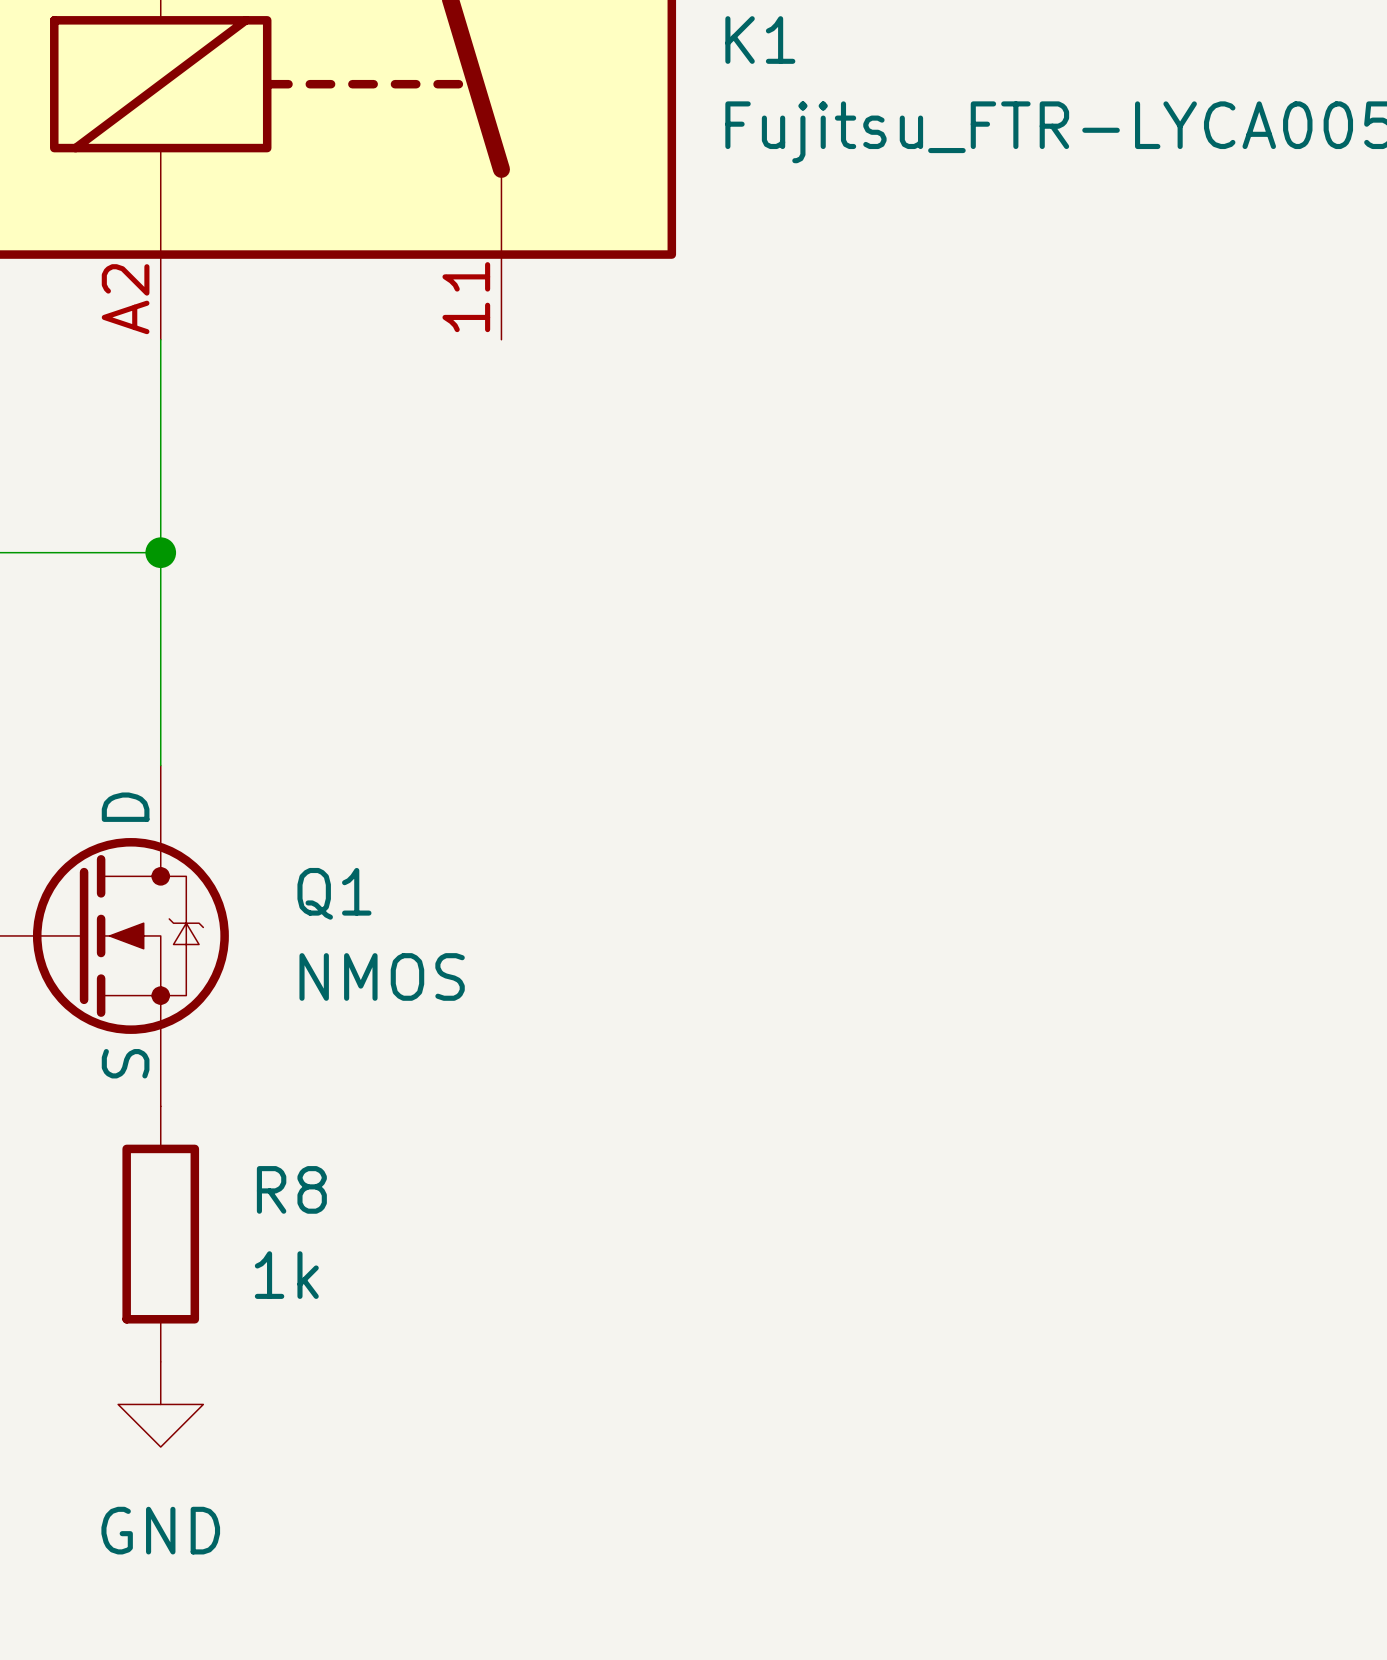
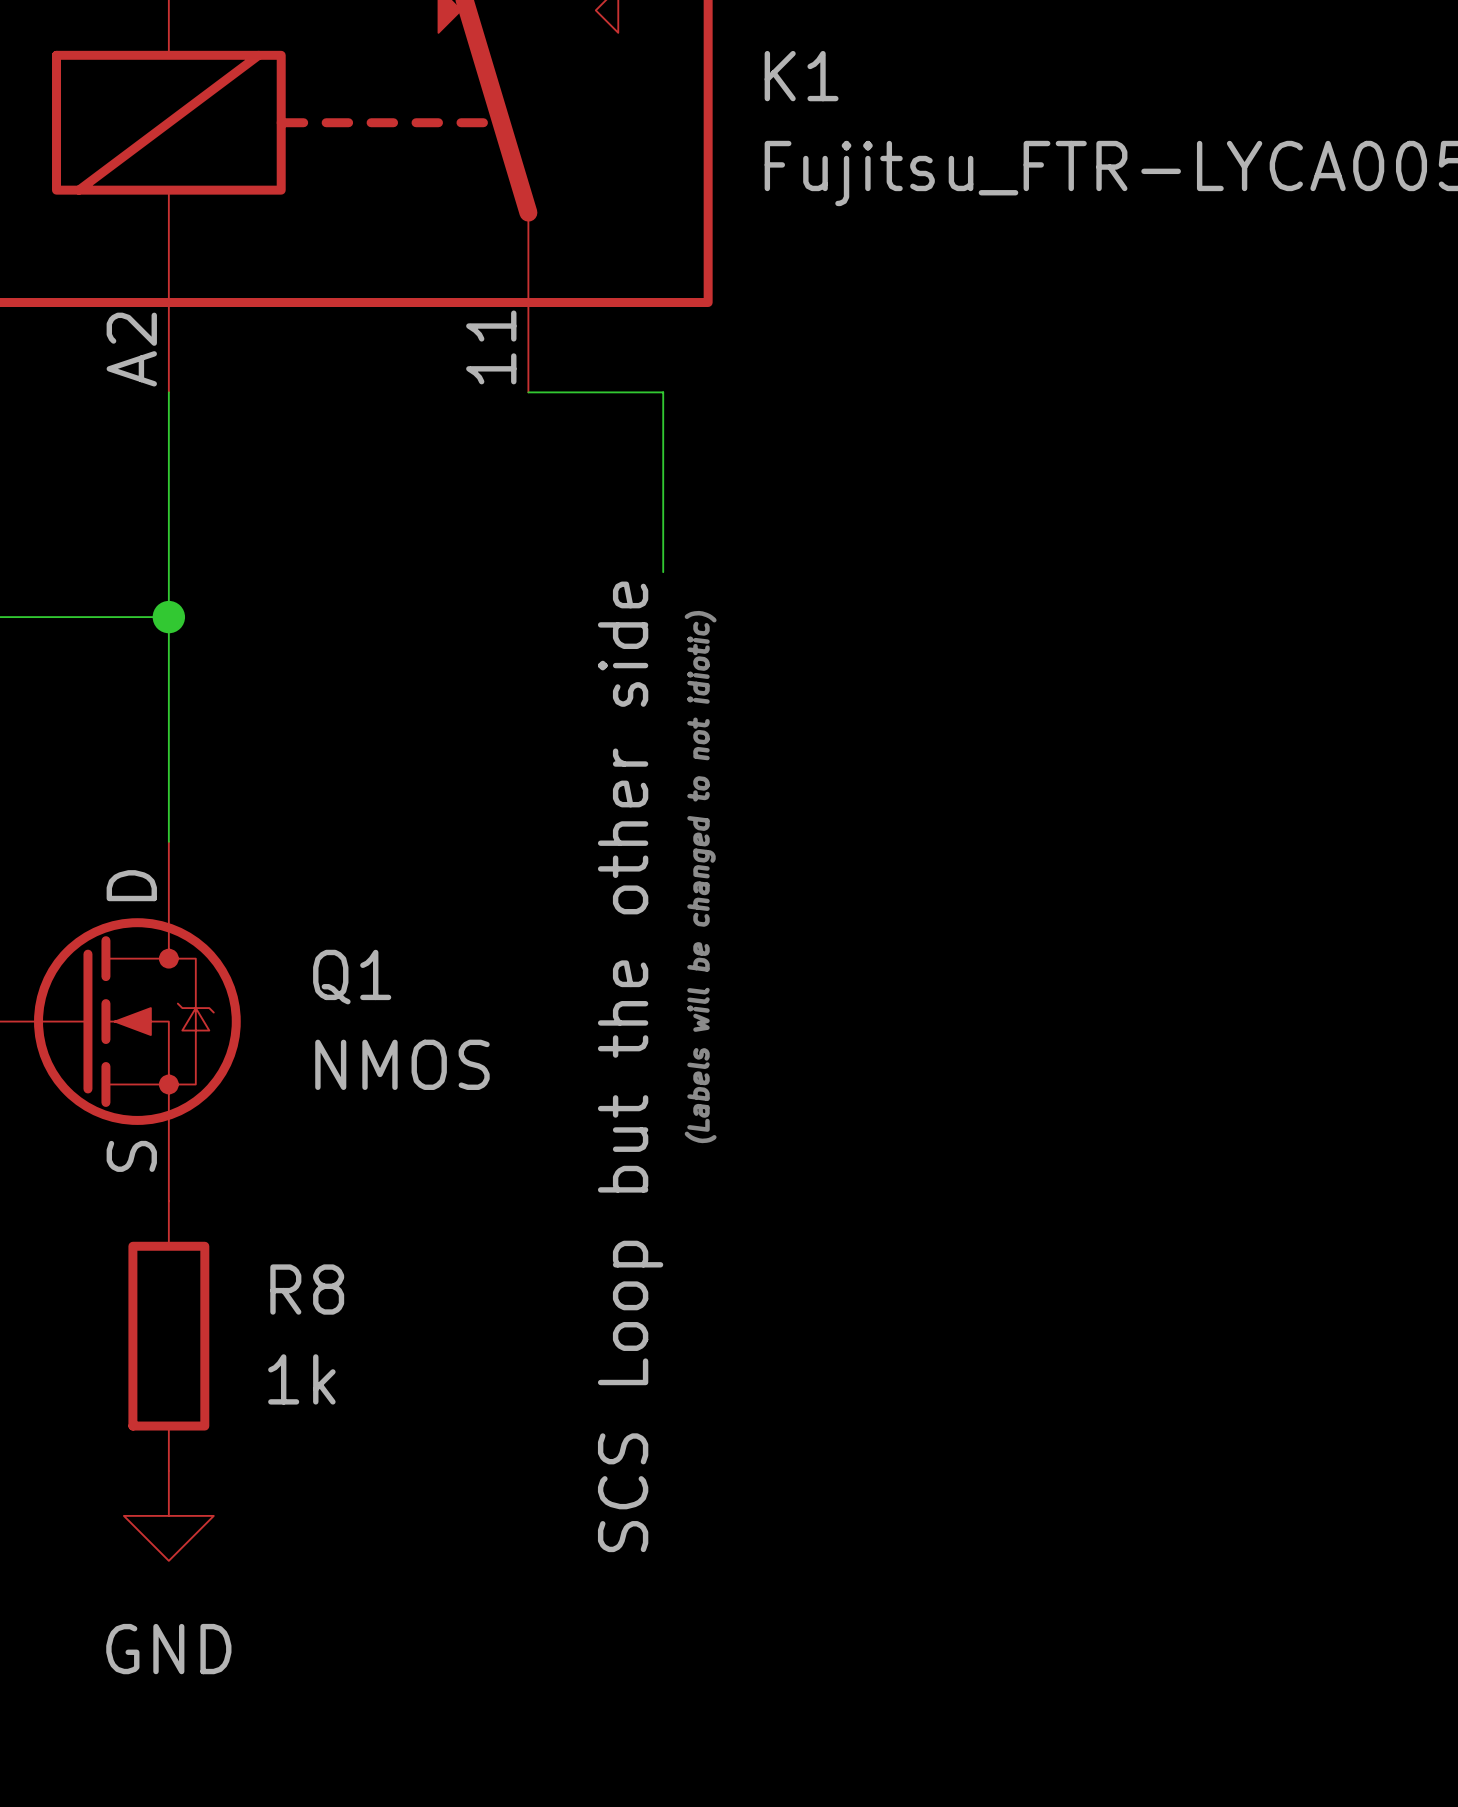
wire: none -> (528, 392) (663, 392) (663, 572)
text: none -> (Labels will be changed to not idiotic) (700, 877)
label: none -> SCS Loop but the other side (630, 1066)

